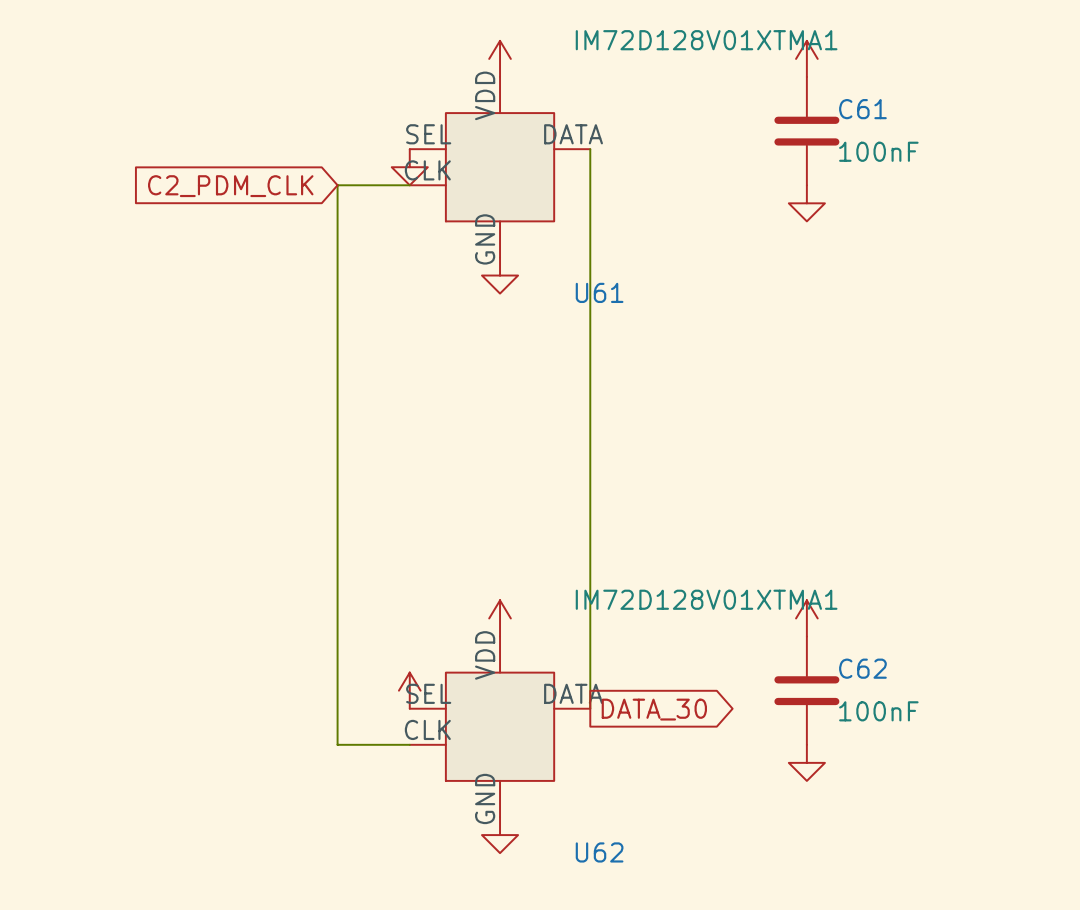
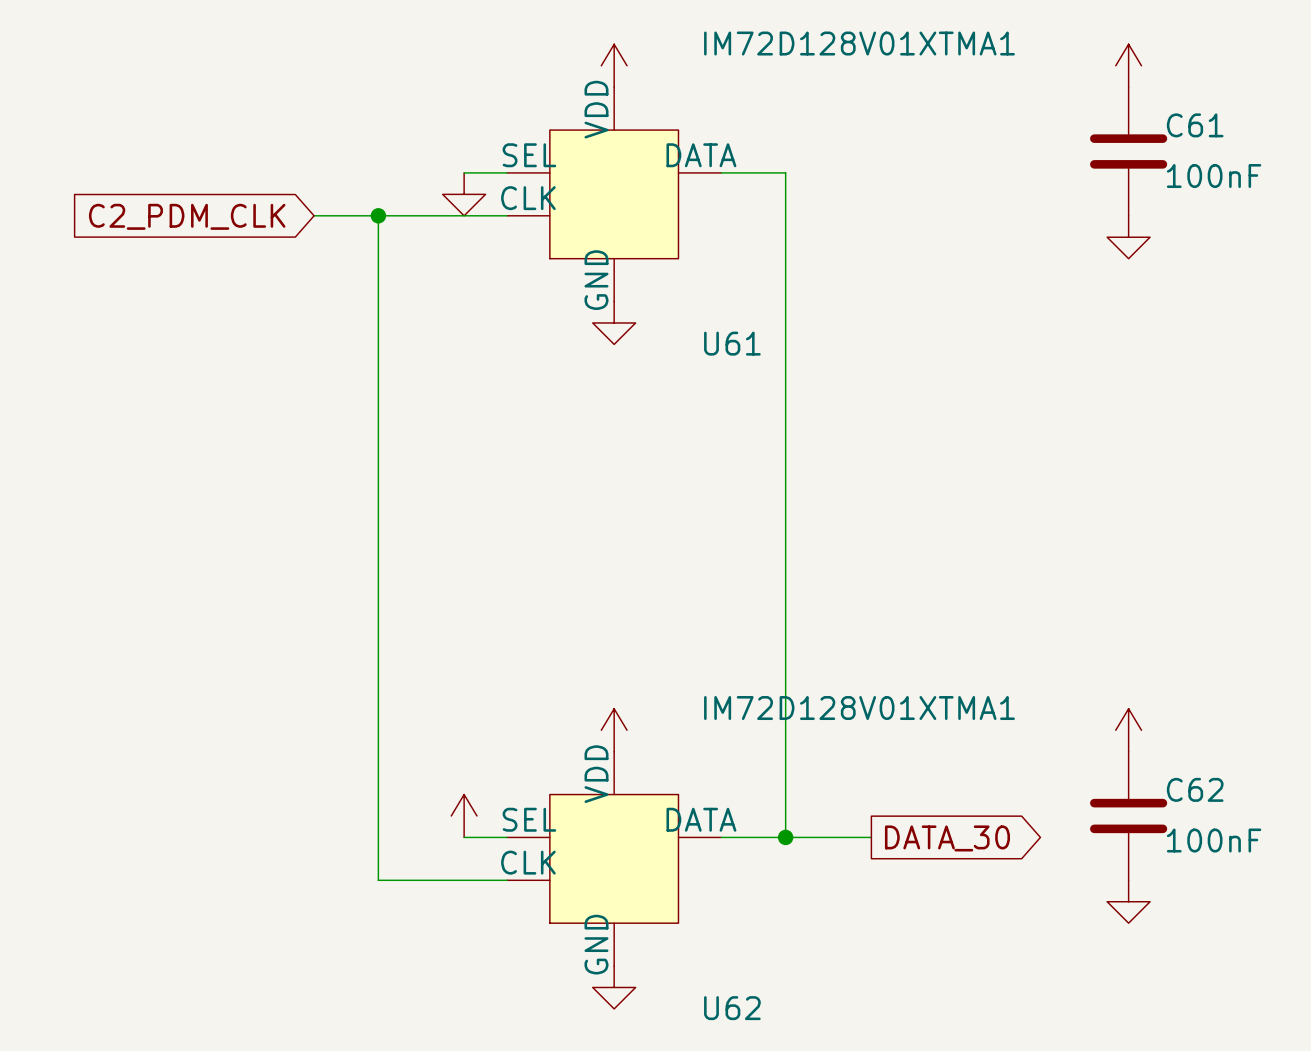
power symbol position: (806, 58) -> (1128, 65)
C61 position: (806, 131) -> (1128, 151)
wire: none -> (464, 172) (506, 172)
wire: (590, 149) (590, 708) -> (721, 172) (785, 172) (785, 837)
power symbol position: (409, 167) -> (464, 194)
wire: none -> (314, 215) (421, 215)
junction: none -> (378, 215)
wire: (337, 185) (337, 744) -> (378, 215) (378, 880) (421, 880)
global label position: C2_PDM_CLK (230, 186) -> C2_PDM_CLK (187, 216)
power symbol position: (806, 203) -> (1128, 237)
power symbol position: (806, 618) -> (1128, 730)
power symbol position: (409, 690) -> (464, 815)
C62 position: (806, 690) -> (1128, 815)
wire: none -> (464, 837) (506, 837)
wire: none -> (721, 837) (871, 837)
junction: none -> (785, 837)
global label position: DATA_30 (654, 709) -> DATA_30 (947, 838)
power symbol position: (806, 762) -> (1128, 901)

